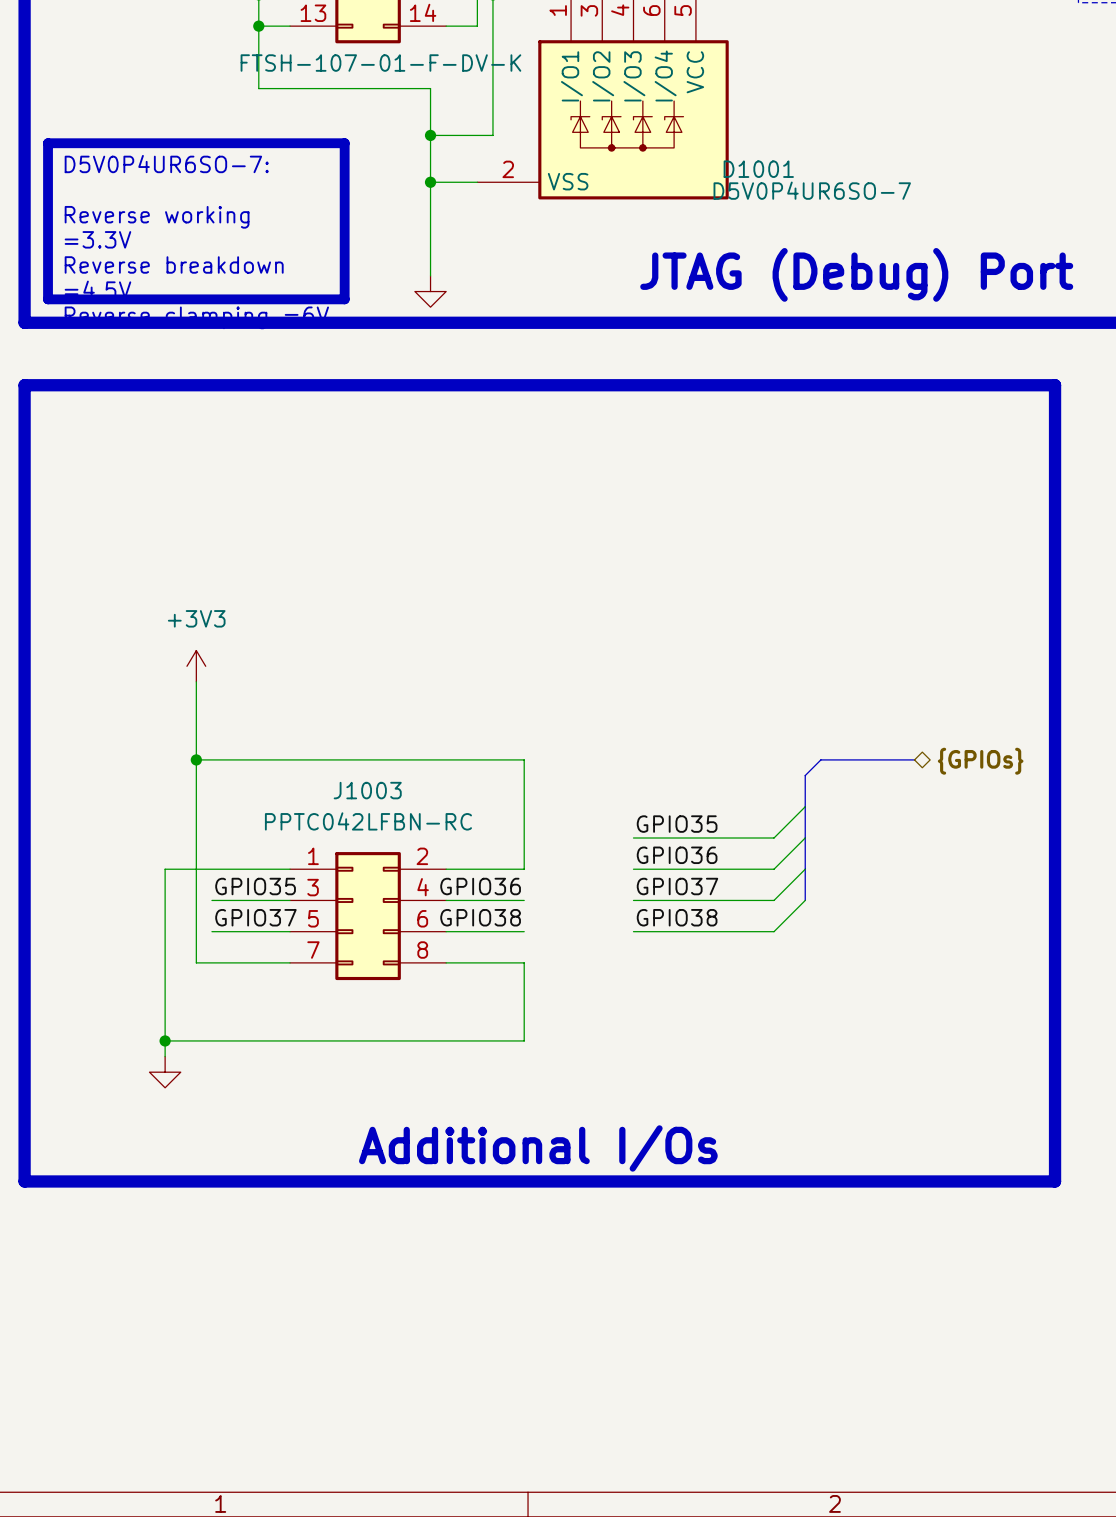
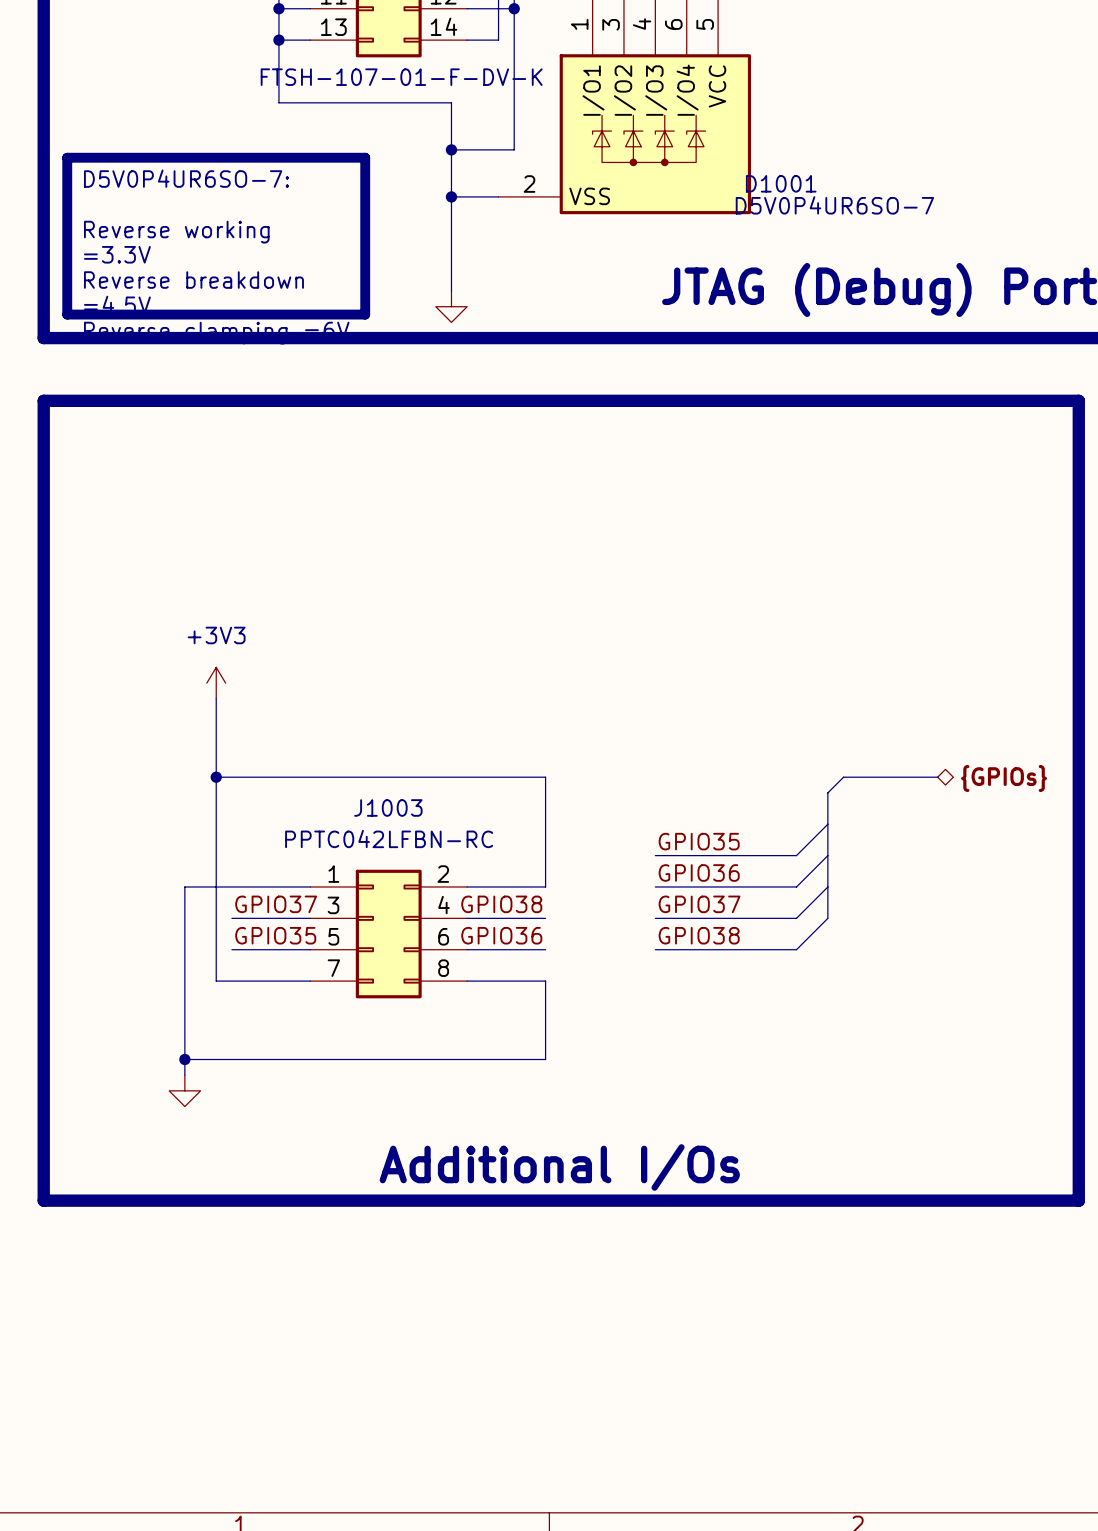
label: GPIO35 (255, 886) -> GPIO37 (276, 904)
label: GPIO36 (480, 886) -> GPIO38 (501, 904)
label: GPIO37 (255, 917) -> GPIO35 (275, 935)
label: GPIO38 (480, 917) -> GPIO36 (501, 935)

